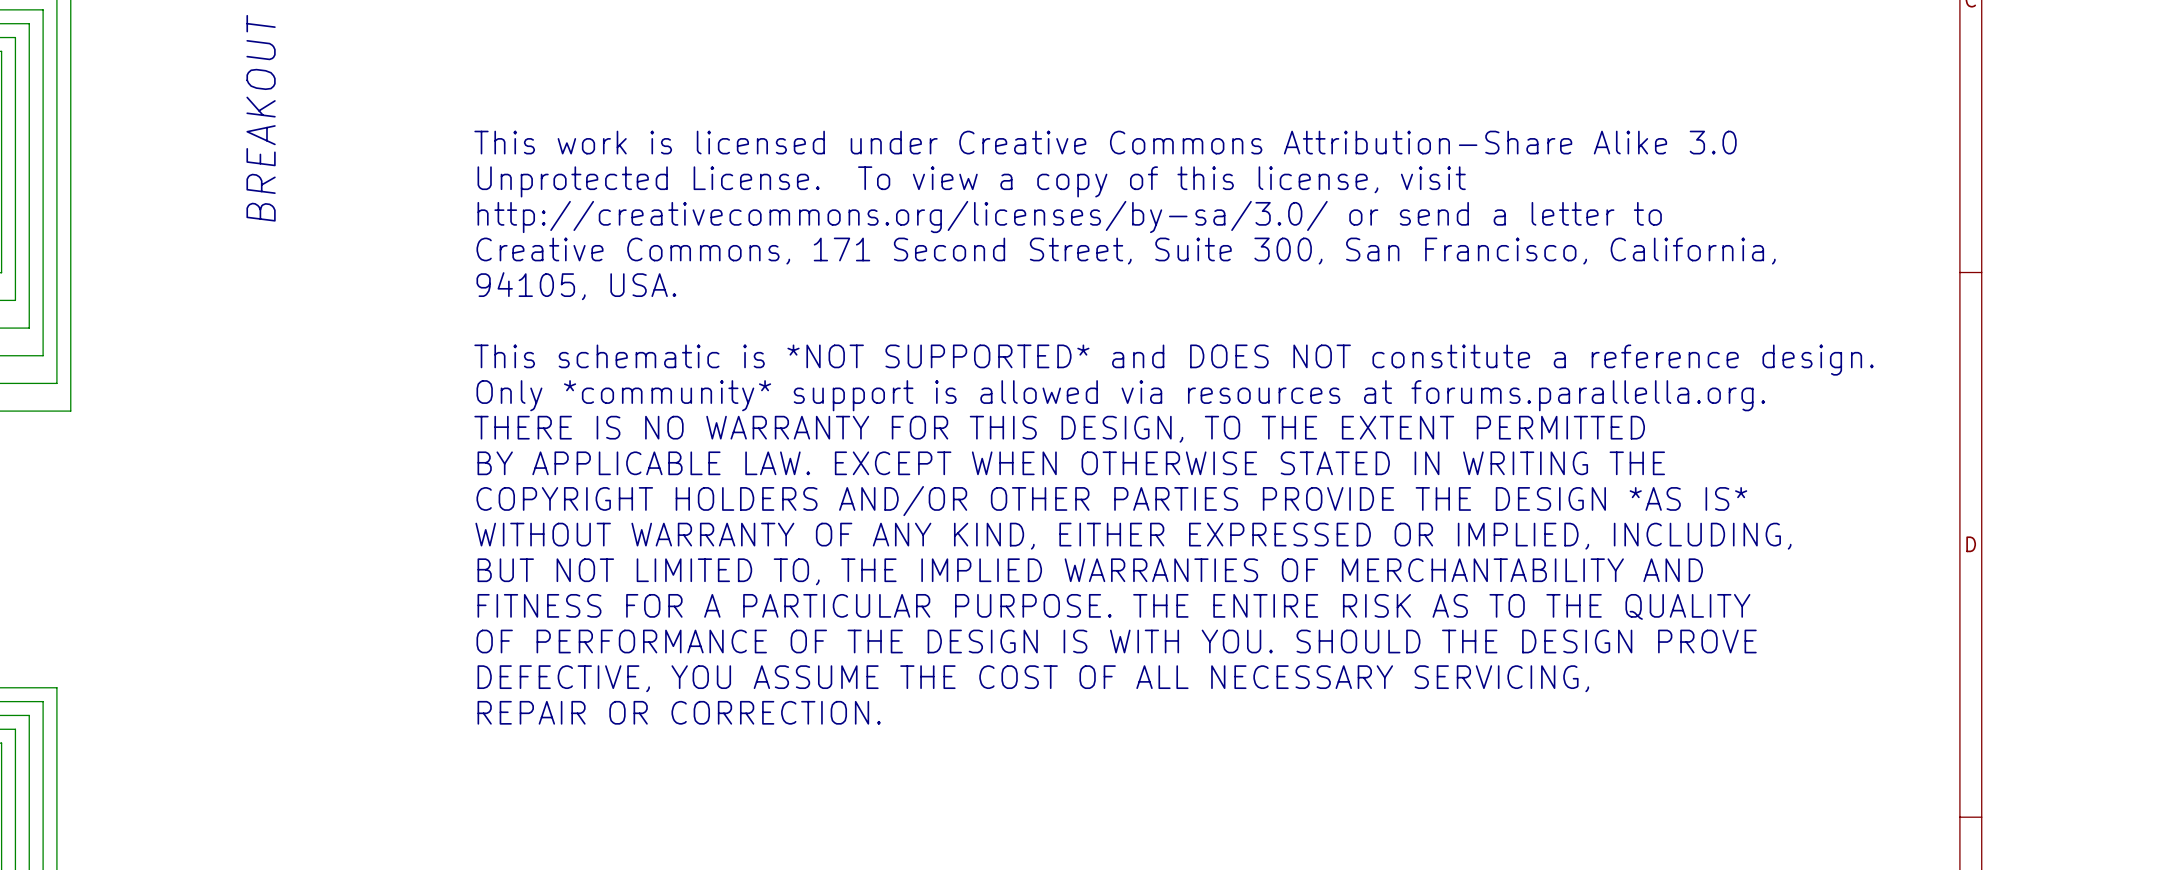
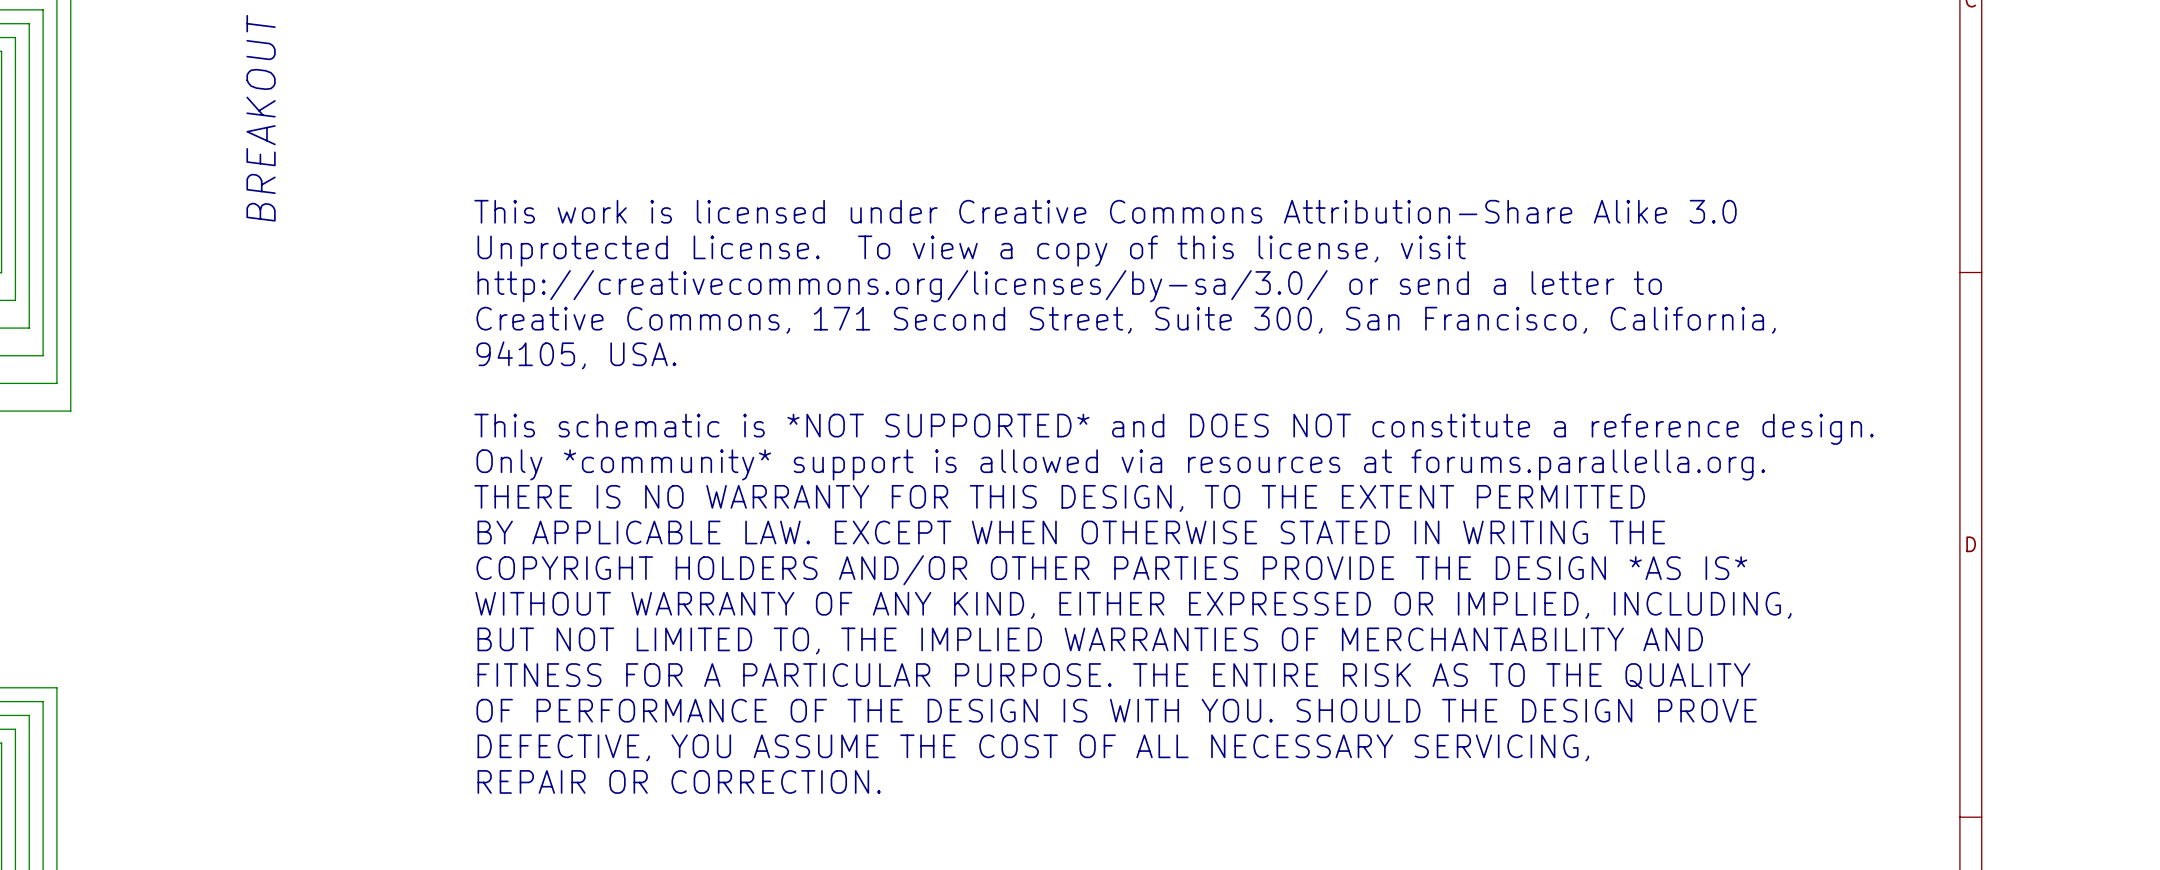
text position: This work is licensed under Creative Commons Attribution-Share Alike 3.0 (1105, 142) -> This work is licensed under Creative Commons Attribution-Share Alike 3.0 (1105, 211)
text position: Unprotected License. To view a copy of this license, visit (971, 181) -> Unprotected License. To view a copy of this license, visit (971, 251)
text position: http://creativecommons.org/licenses/by-sa/3.0/ or send a letter to (1069, 217) -> http://creativecommons.org/licenses/by-sa/3.0/ or send a letter to (1069, 286)
text position: Creative Commons, 171 Second Street, Suite 300, San Francisco, California, (1126, 251) -> Creative Commons, 171 Second Street, Suite 300, San Francisco, California, (1126, 320)
text position: 94105, USA. (576, 286) -> 94105, USA. (576, 355)
text position: This schematic is *NOT SUPPORTED* and DOES NOT constitute a reference design. (1174, 360) -> This schematic is *NOT SUPPORTED* and DOES NOT constitute a reference design. (1174, 429)
text position: Only *community* support is allowed via resources at forums.parallella.org. (1120, 395) -> Only *community* support is allowed via resources at forums.parallella.org. (1120, 464)
text position: THERE IS NO WARRANTY FOR THIS DESIGN, TO THE EXTENT PERMITTED (1059, 429) -> THERE IS NO WARRANTY FOR THIS DESIGN, TO THE EXTENT PERMITTED (1059, 498)
text position: BY APPLICABLE LAW. EXCEPT WHEN OTHERWISE STATED IN WRITING THE (1071, 463) -> BY APPLICABLE LAW. EXCEPT WHEN OTHERWISE STATED IN WRITING THE (1071, 532)
text position: COPYRIGHT HOLDERS AND/OR OTHER PARTIES PROVIDE THE DESIGN *AS IS* (1111, 501) -> COPYRIGHT HOLDERS AND/OR OTHER PARTIES PROVIDE THE DESIGN *AS IS* (1111, 570)
text position: WITHOUT WARRANTY OF ANY KIND, EITHER EXPRESSED OR IMPLIED, INCLUDING, (1133, 536) -> WITHOUT WARRANTY OF ANY KIND, EITHER EXPRESSED OR IMPLIED, INCLUDING, (1133, 605)
text position: BUT NOT LIMITED TO, THE IMPLIED WARRANTIES OF MERCHANTABILITY AND (1090, 571) -> BUT NOT LIMITED TO, THE IMPLIED WARRANTIES OF MERCHANTABILITY AND (1090, 640)
text position: FITNESS FOR A PARTICULAR PURPOSE. THE ENTIRE RISK AS TO THE QUALITY (1113, 606) -> FITNESS FOR A PARTICULAR PURPOSE. THE ENTIRE RISK AS TO THE QUALITY (1113, 676)
text position: OF PERFORMANCE OF THE DESIGN IS WITH YOU. SHOULD THE DESIGN PROVE (1116, 641) -> OF PERFORMANCE OF THE DESIGN IS WITH YOU. SHOULD THE DESIGN PROVE (1116, 710)
text position: DEFECTIVE, YOU ASSUME THE COST OF ALL NECESSARY SERVICING, (1033, 678) -> DEFECTIVE, YOU ASSUME THE COST OF ALL NECESSARY SERVICING, (1033, 747)
text position: REPAIR OR CORRECTION. (679, 712) -> REPAIR OR CORRECTION. (679, 781)

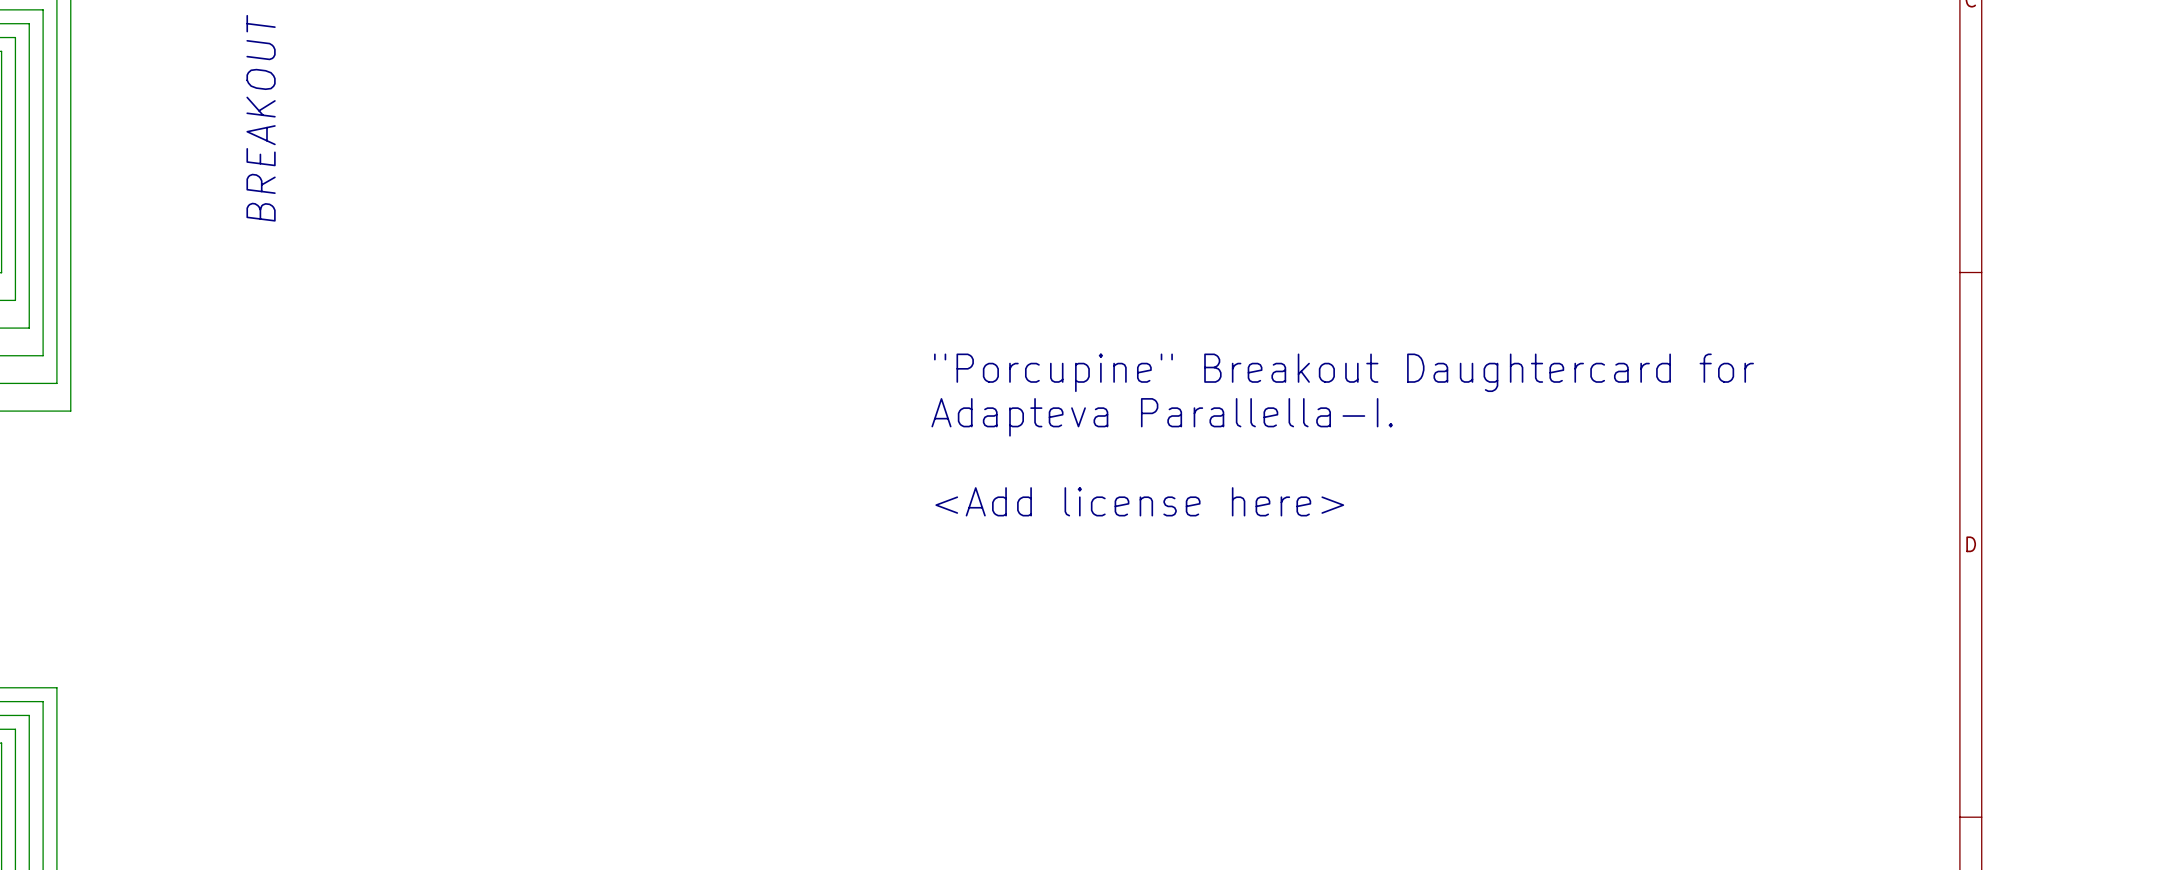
text: This work is licensed under Creative Commons Attribution-Share Alike 3.0 (1105, 211) -> none
text: Unprotected License. To view a copy of this license, visit (971, 251) -> none
text: http://creativecommons.org/licenses/by-sa/3.0/ or send a letter to (1069, 286) -> none
text: Creative Commons, 171 Second Street, Suite 300, San Francisco, California, (1126, 320) -> none
text: 94105, USA. (576, 355) -> none
text: none -> "Porcupine" Breakout Daughtercard for (1344, 372)
text: none -> Adapteva Parallella-I. (1162, 417)
text: This schematic is *NOT SUPPORTED* and DOES NOT constitute a reference design. (1174, 429) -> none
text: Only *community* support is allowed via resources at forums.parallella.org. (1120, 464) -> none
text: THERE IS NO WARRANTY FOR THIS DESIGN, TO THE EXTENT PERMITTED (1059, 498) -> none
text: none -> <Add license here> (1139, 501)
text: BY APPLICABLE LAW. EXCEPT WHEN OTHERWISE STATED IN WRITING THE (1071, 532) -> none
text: COPYRIGHT HOLDERS AND/OR OTHER PARTIES PROVIDE THE DESIGN *AS IS* (1111, 570) -> none
text: WITHOUT WARRANTY OF ANY KIND, EITHER EXPRESSED OR IMPLIED, INCLUDING, (1133, 605) -> none
text: BUT NOT LIMITED TO, THE IMPLIED WARRANTIES OF MERCHANTABILITY AND (1090, 640) -> none
text: FITNESS FOR A PARTICULAR PURPOSE. THE ENTIRE RISK AS TO THE QUALITY (1113, 676) -> none
text: OF PERFORMANCE OF THE DESIGN IS WITH YOU. SHOULD THE DESIGN PROVE (1116, 710) -> none
text: DEFECTIVE, YOU ASSUME THE COST OF ALL NECESSARY SERVICING, (1033, 747) -> none
text: REPAIR OR CORRECTION. (679, 781) -> none

